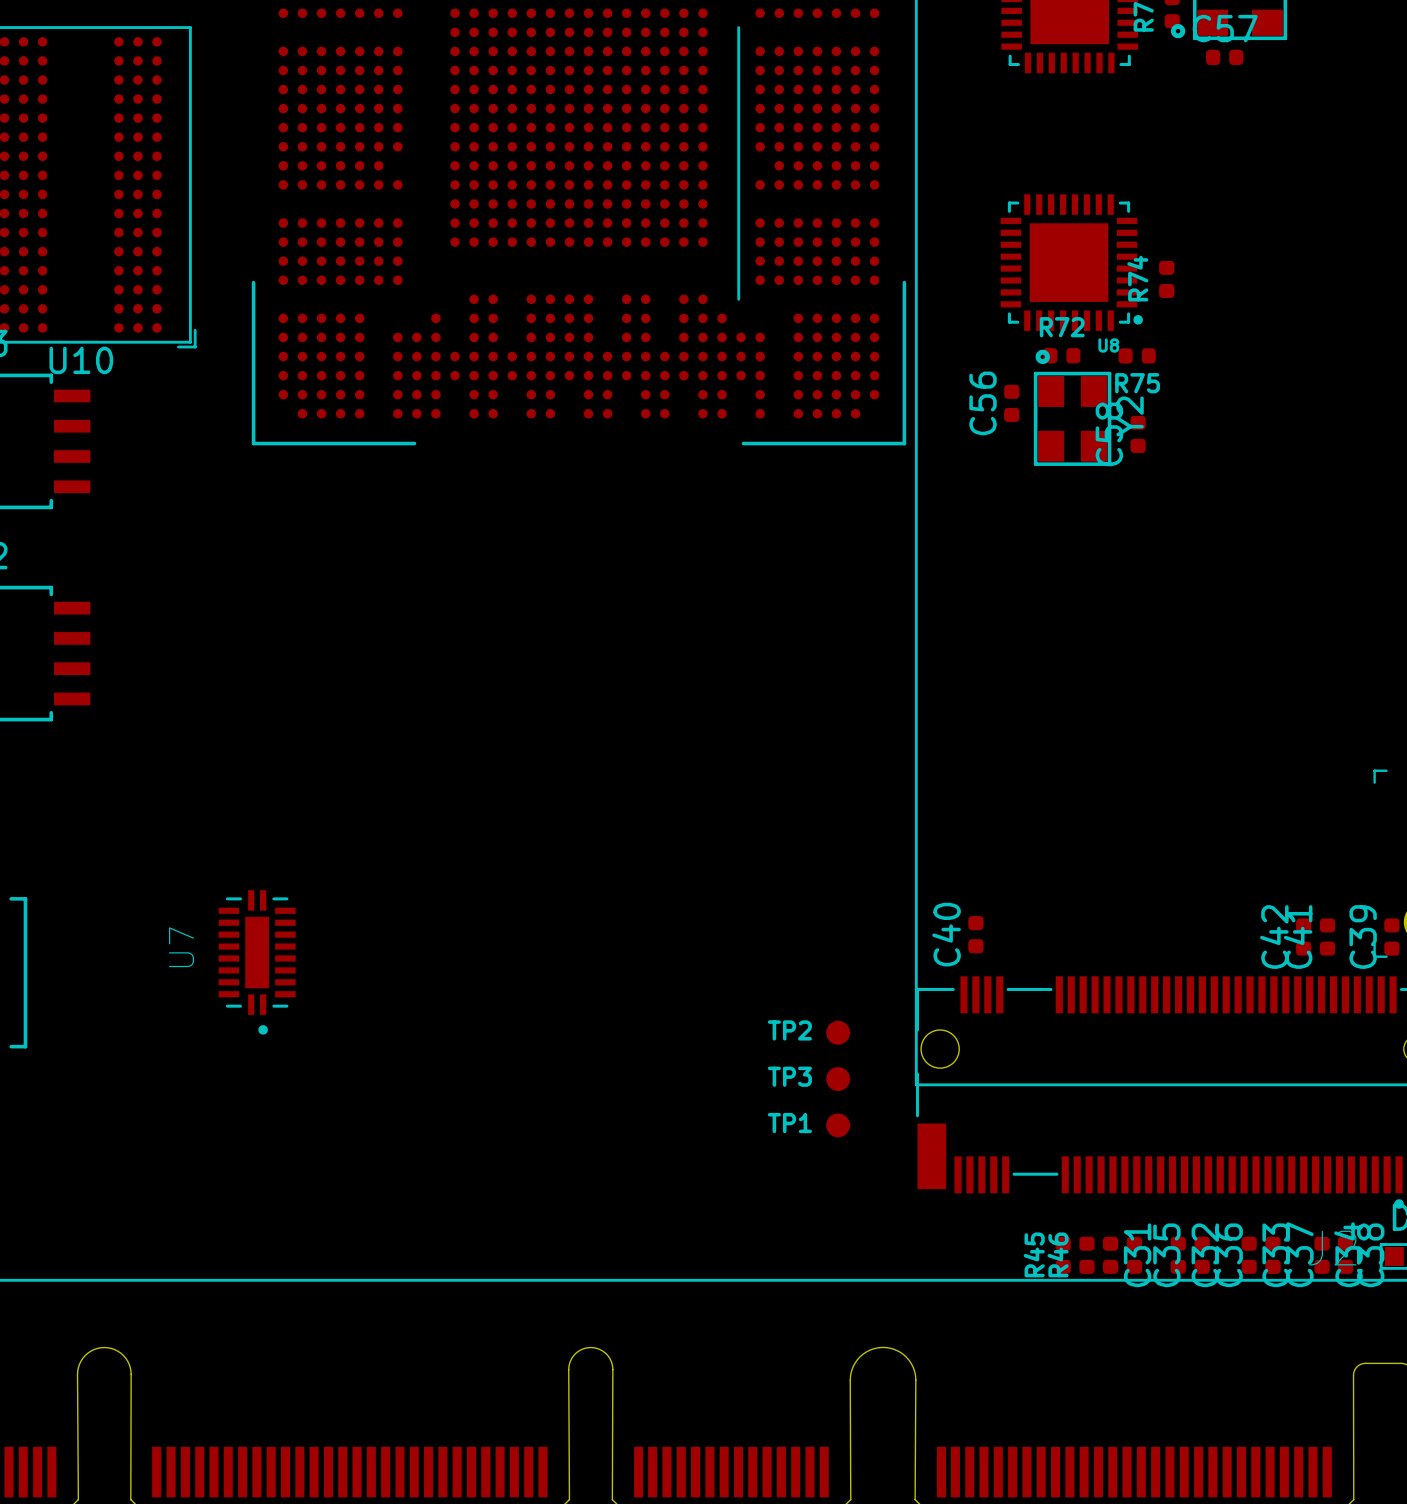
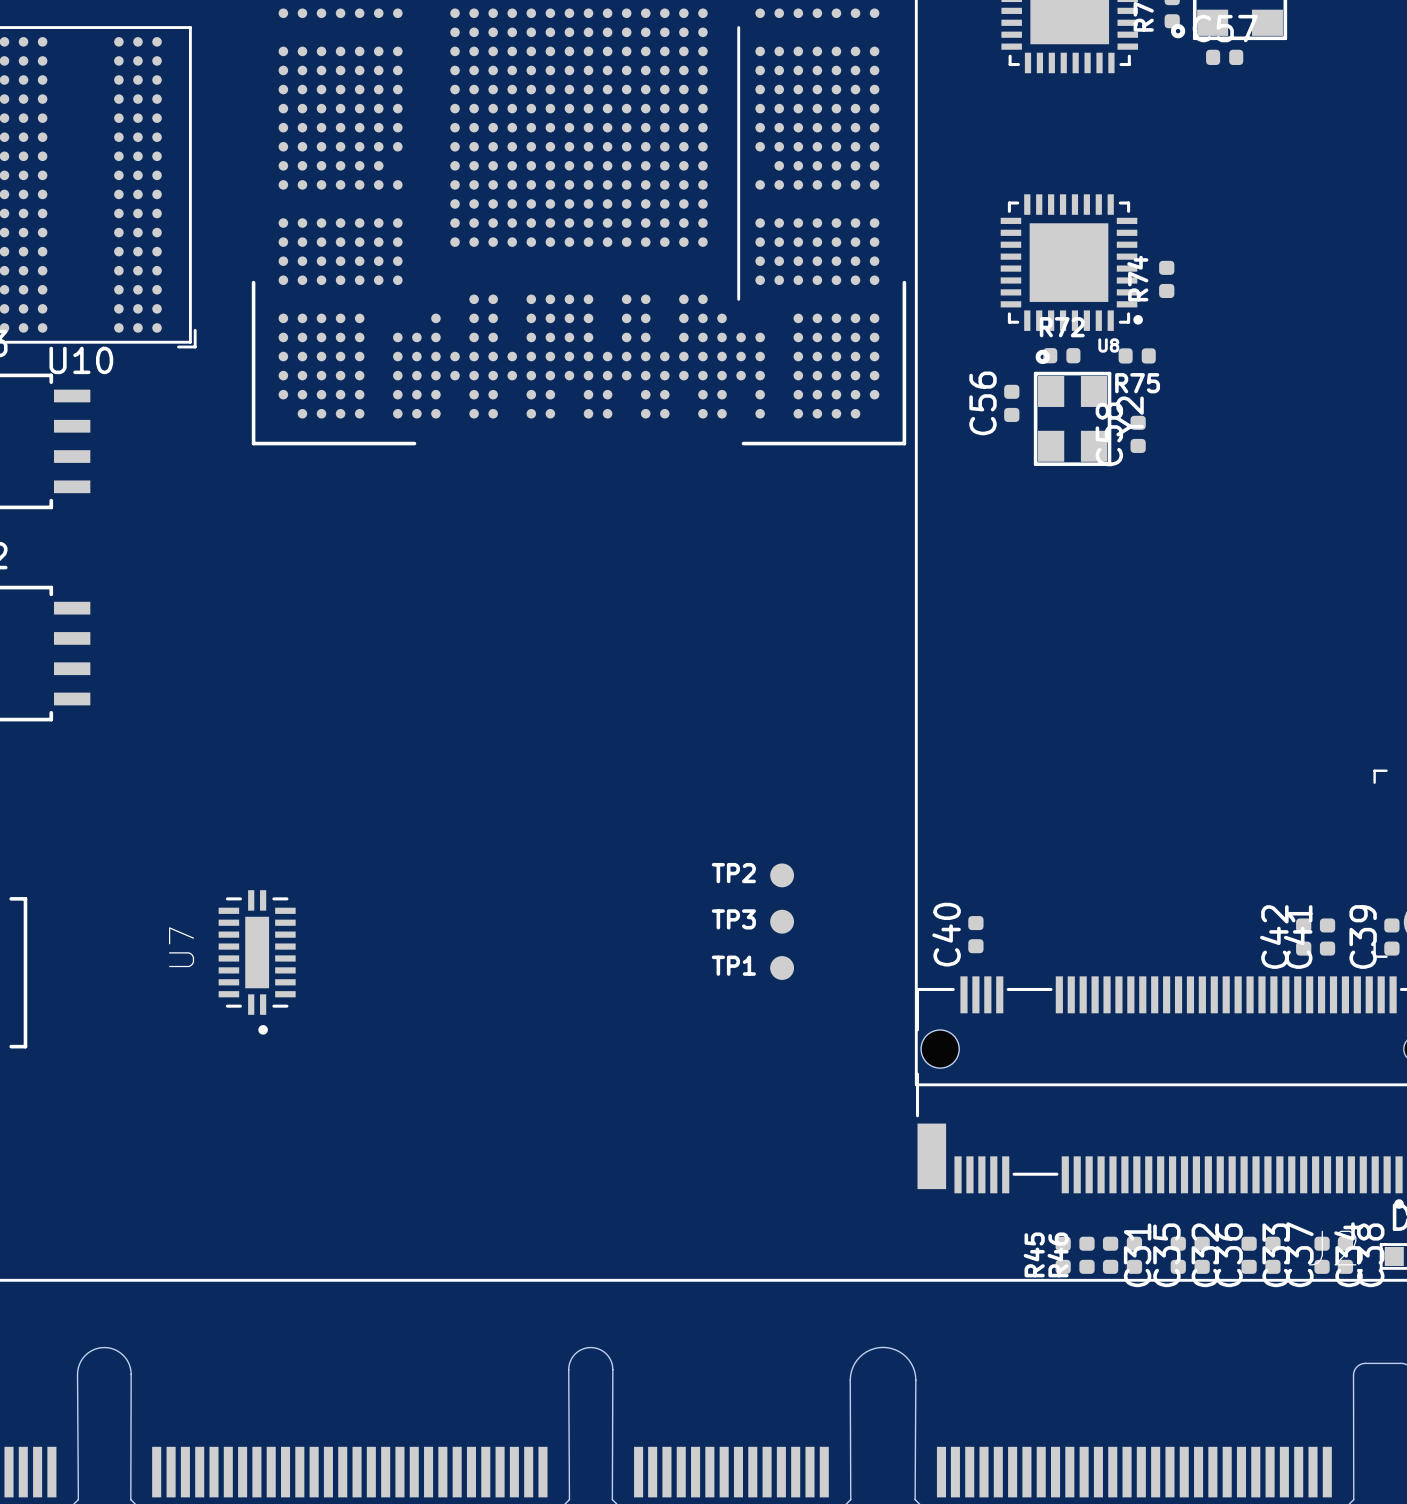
TP2 position: (838, 1032) -> (782, 875)
TP3 position: (838, 1079) -> (782, 921)
TP1 position: (838, 1125) -> (782, 968)

